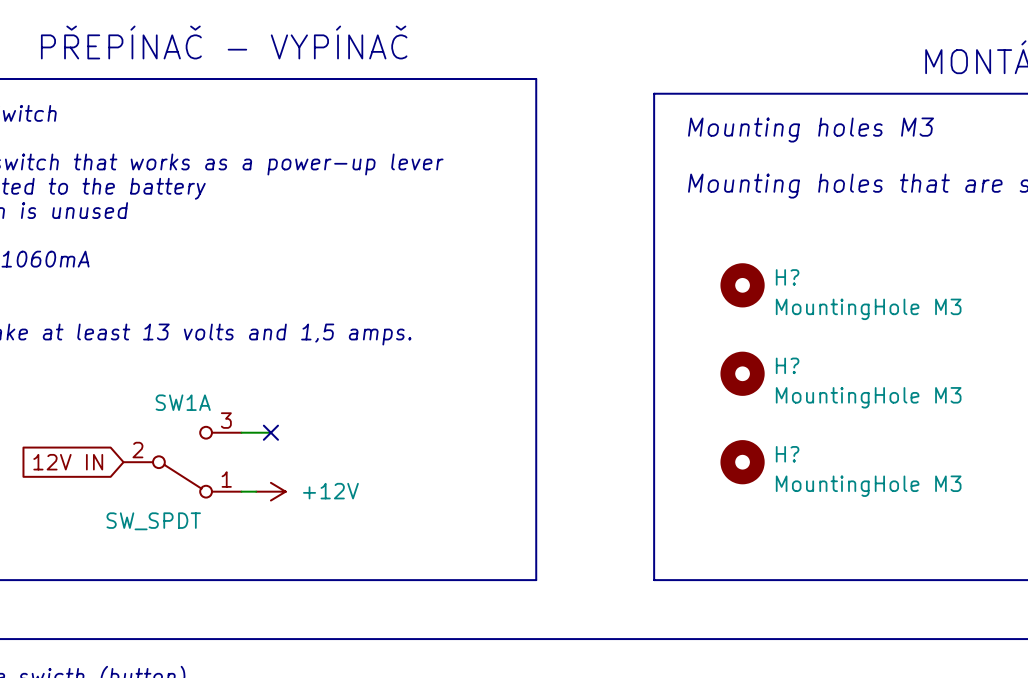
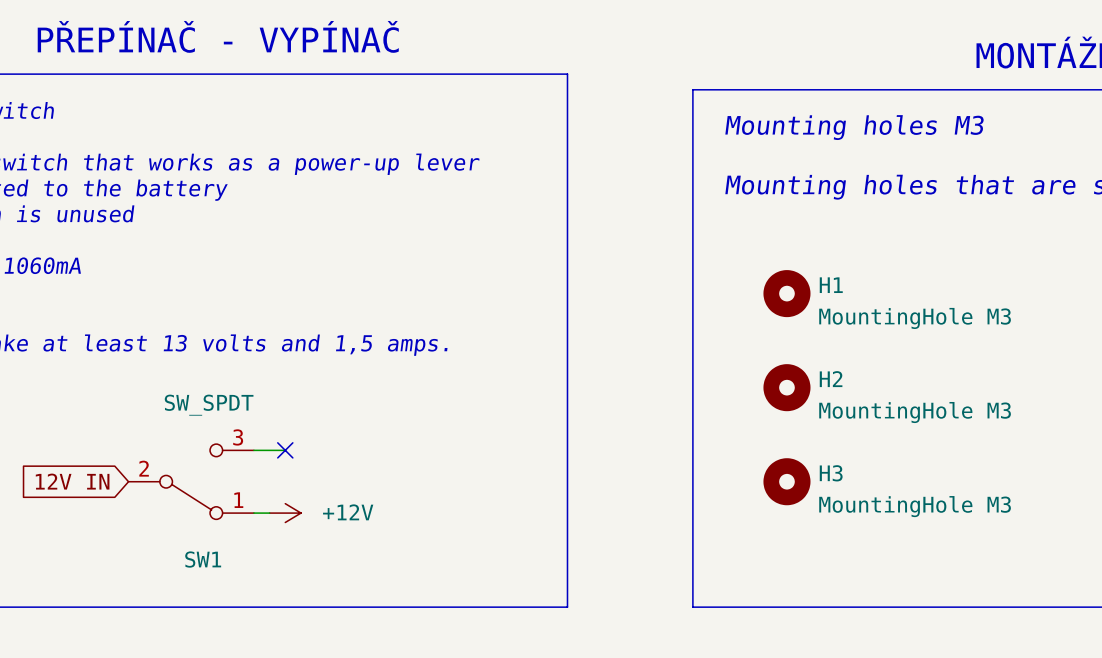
H? name: H? (787, 277) -> H1 (831, 285)
H? name: H? (787, 365) -> H2 (831, 379)
SW1A name: SW1A (183, 402) -> SW1 (203, 559)
H? name: H? (787, 454) -> H3 (831, 473)
SW1A value position: SW_SPDT (153, 521) -> SW_SPDT (209, 405)

